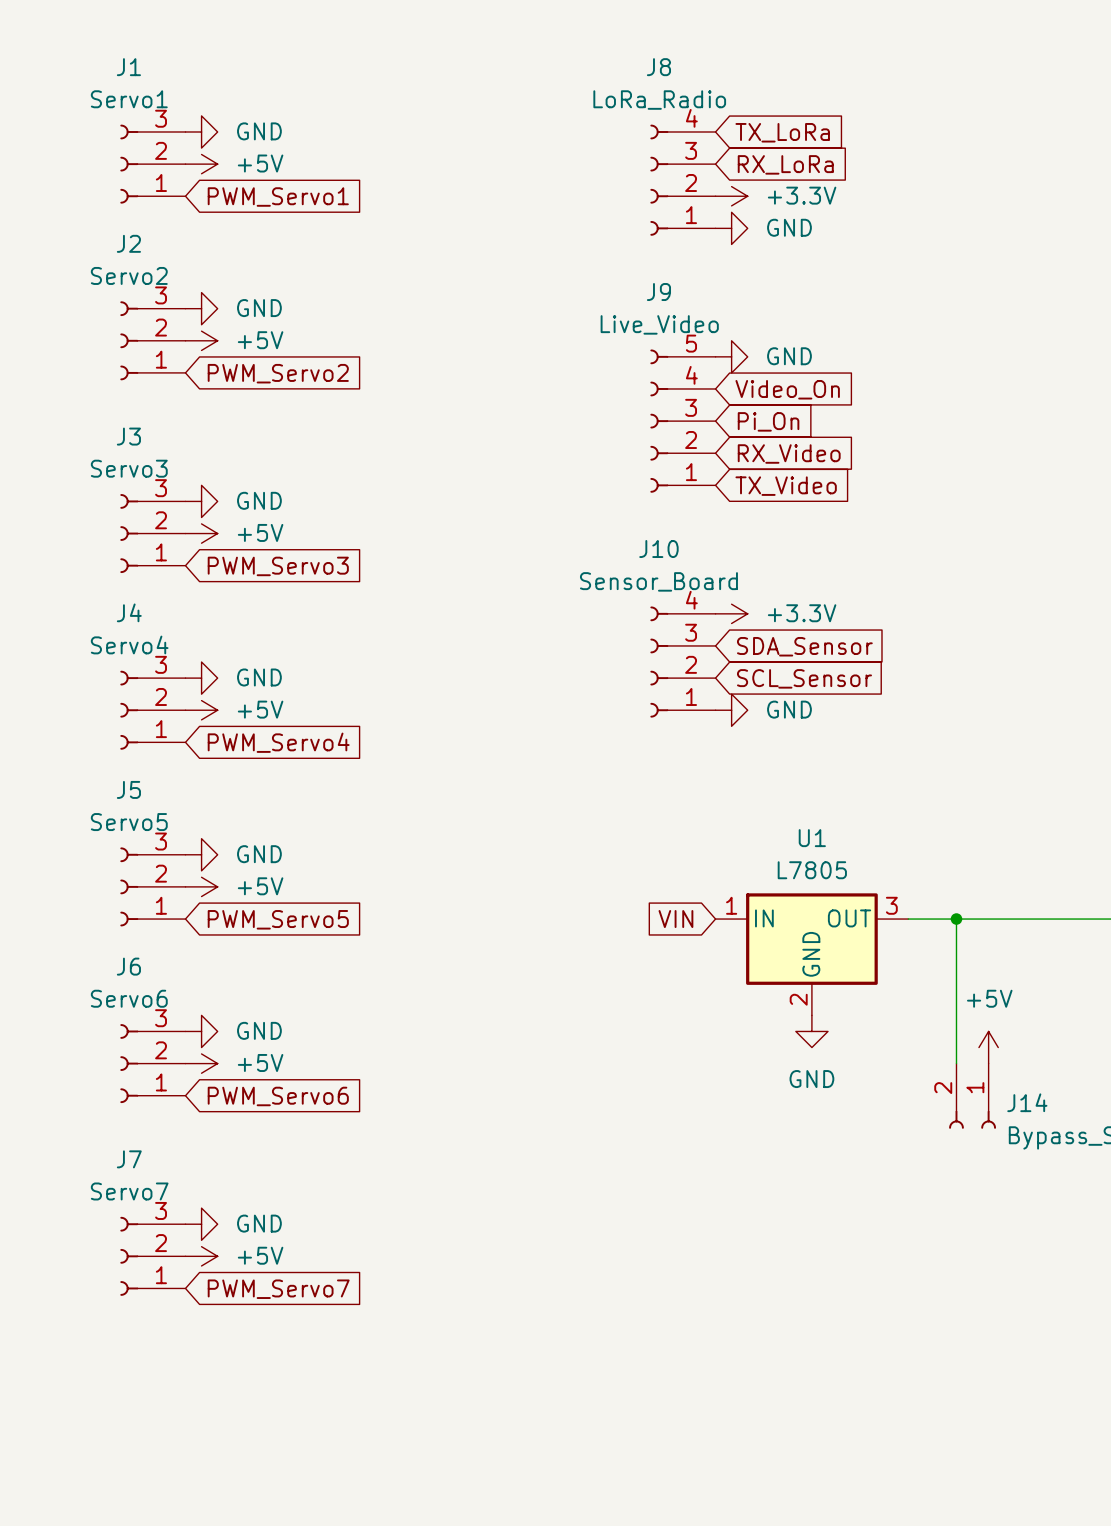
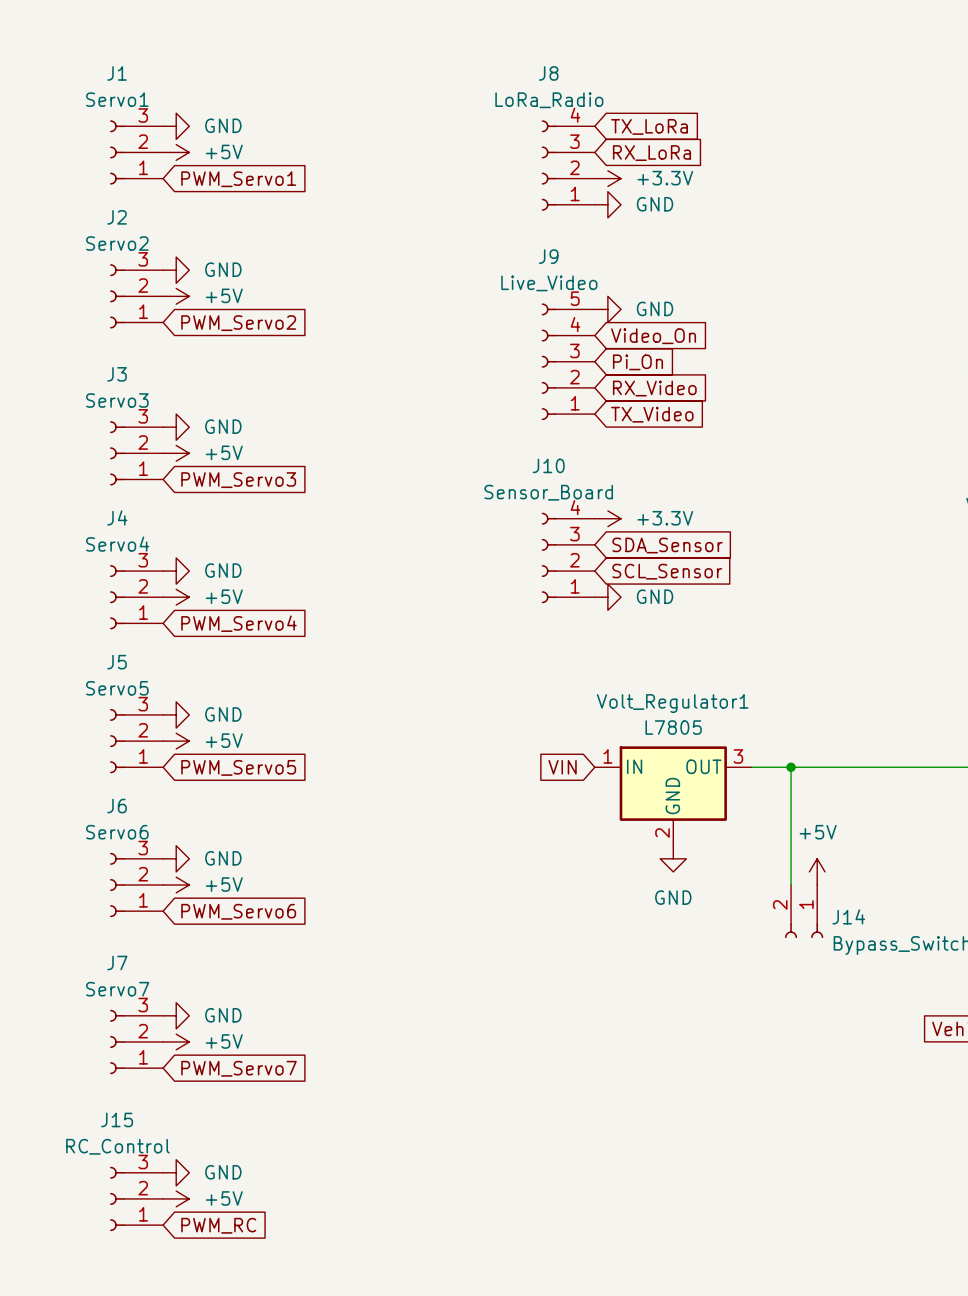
U1 name: U1 (812, 838) -> Volt_Regulator1 (672, 703)
power symbol: none -> GND (176, 1172)
J15: none -> RC_Control (136, 1198)
power symbol: none -> +5V (176, 1198)
global label: none -> PWM_RC (218, 1225)

